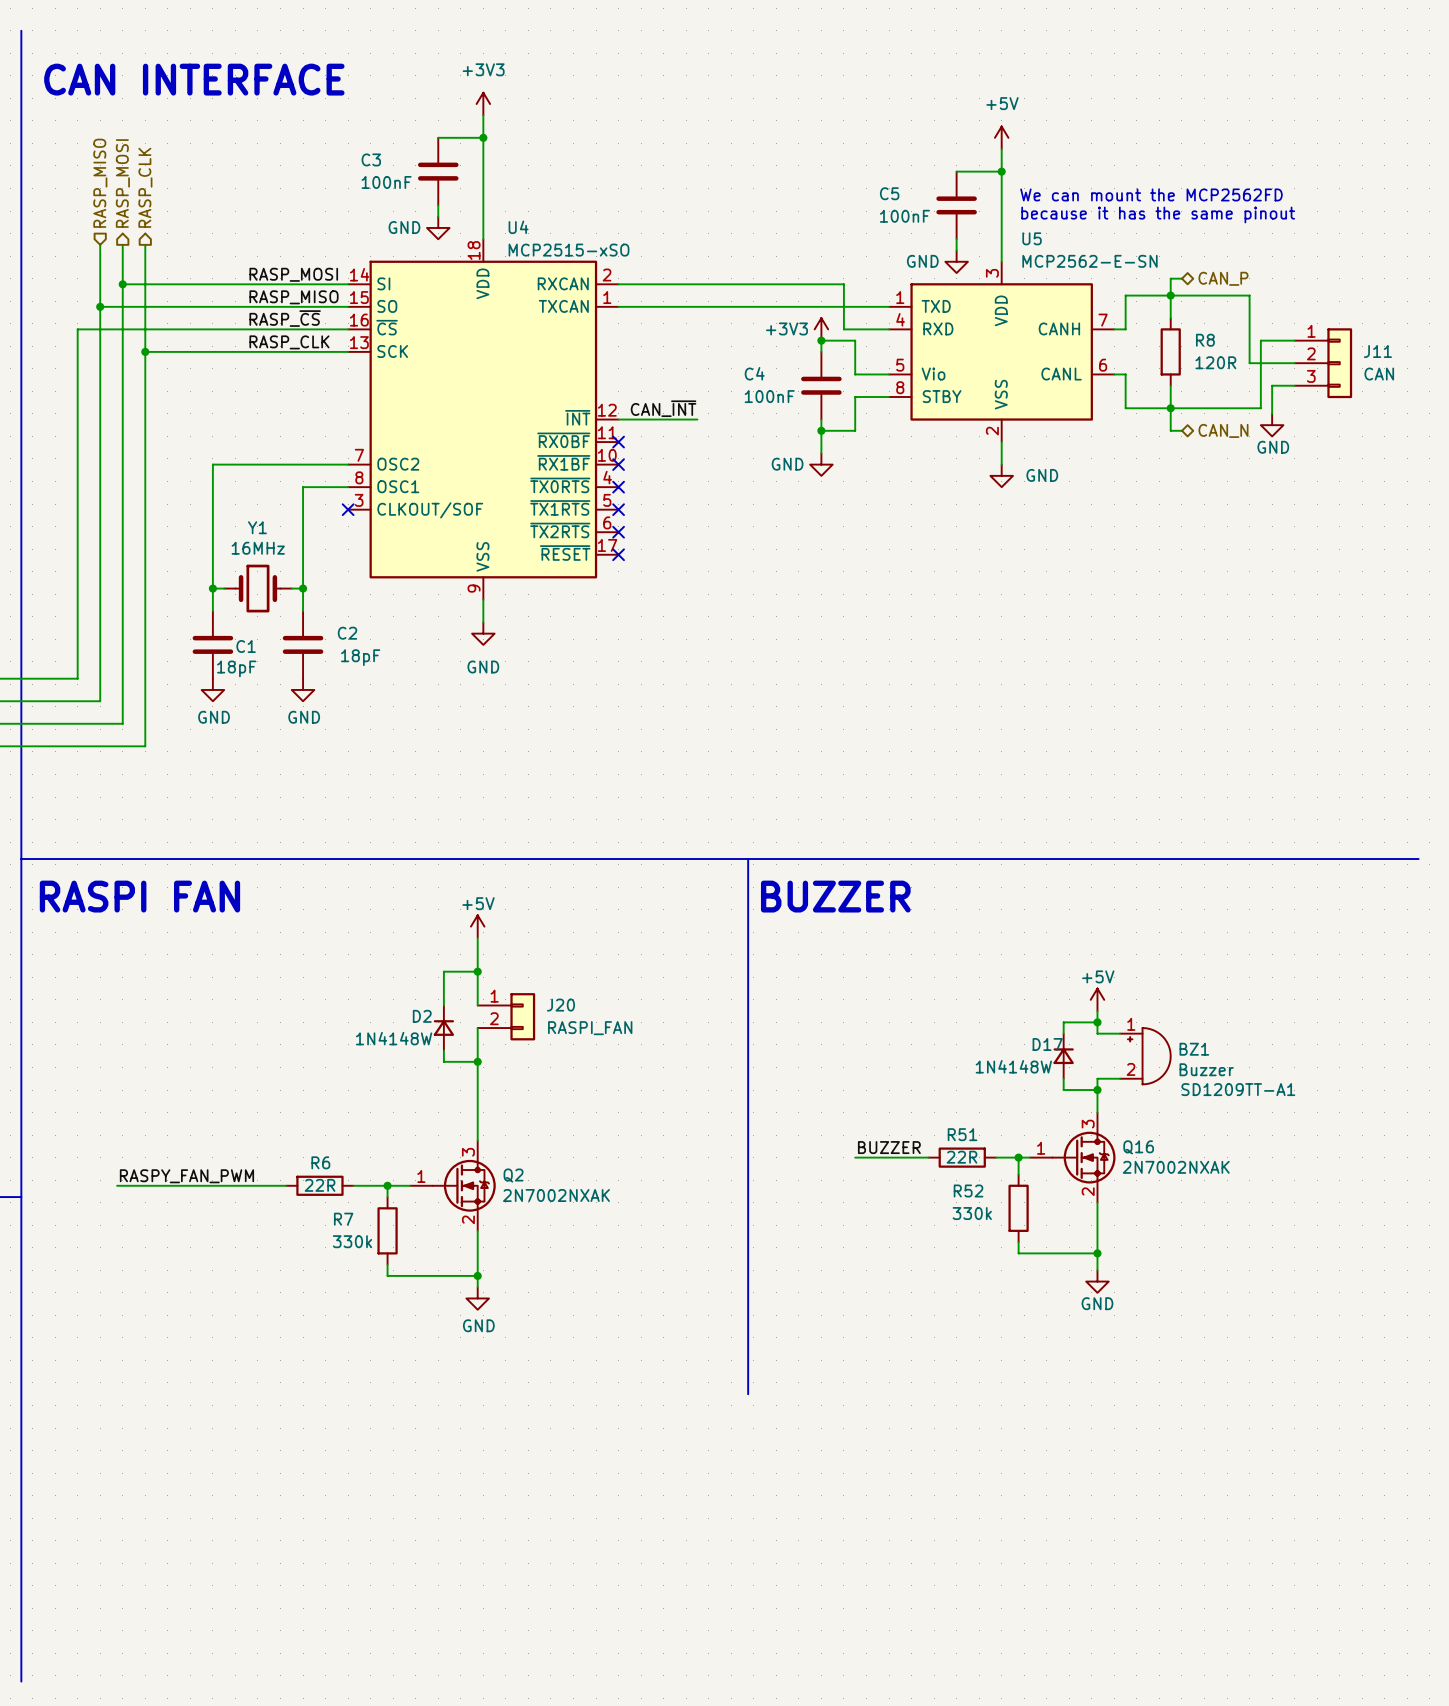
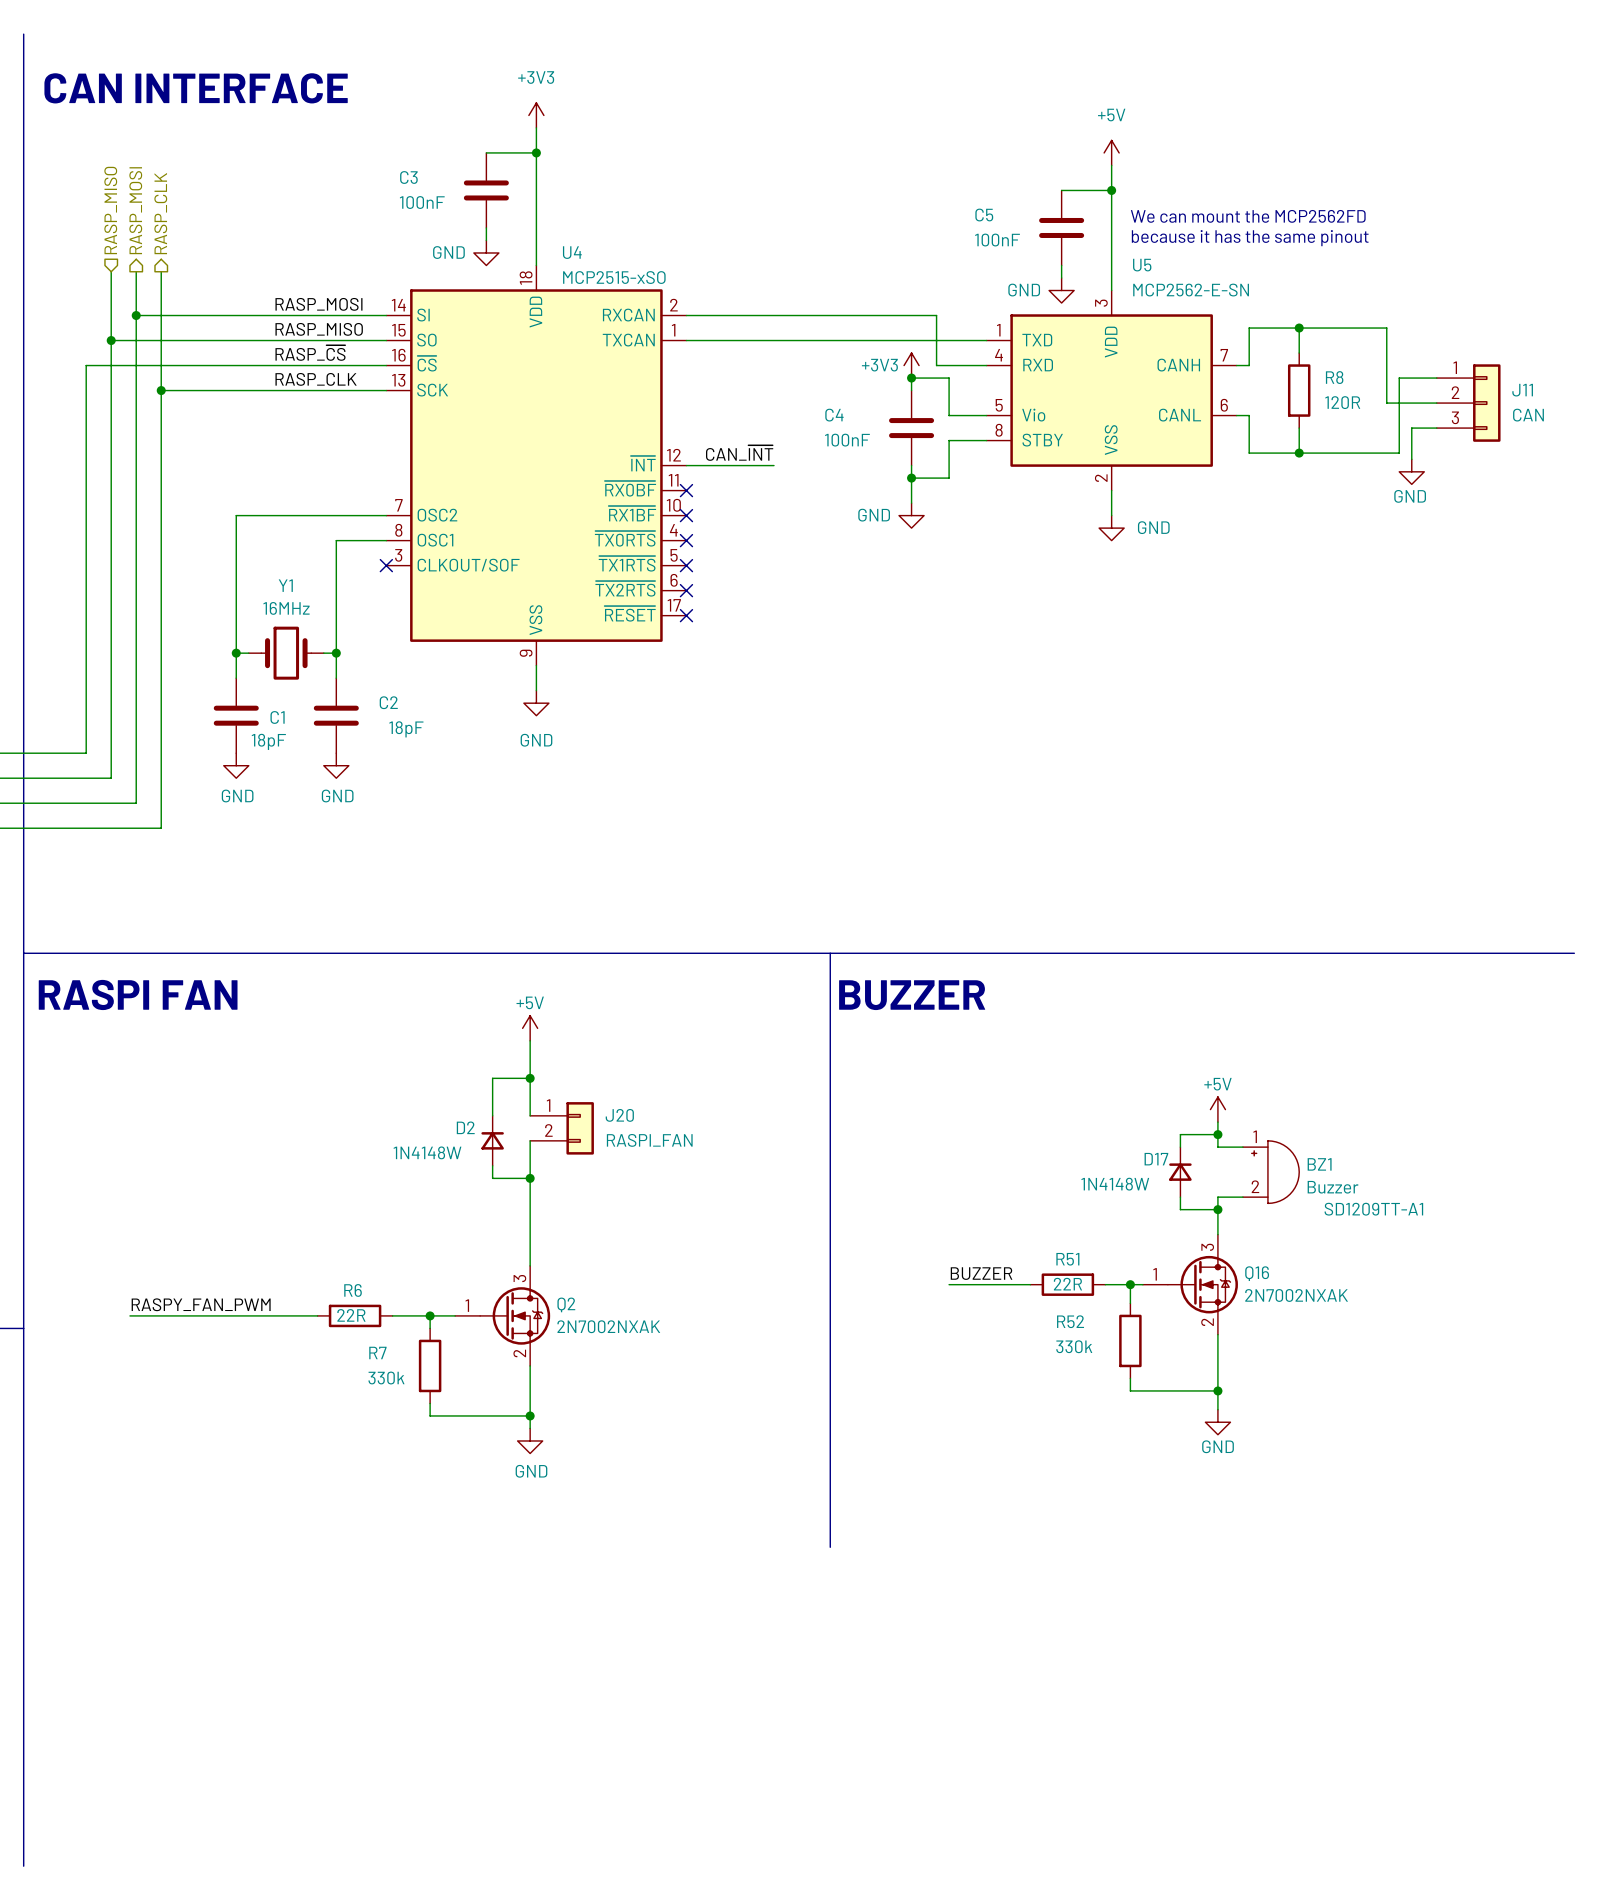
wire: (1181, 278) (1170, 278) (1170, 295) -> none
hierarchical label: CAN_P (1223, 278) -> none
wire: (1170, 408) (1170, 430) (1181, 430) -> none
hierarchical label: CAN_N (1223, 430) -> none

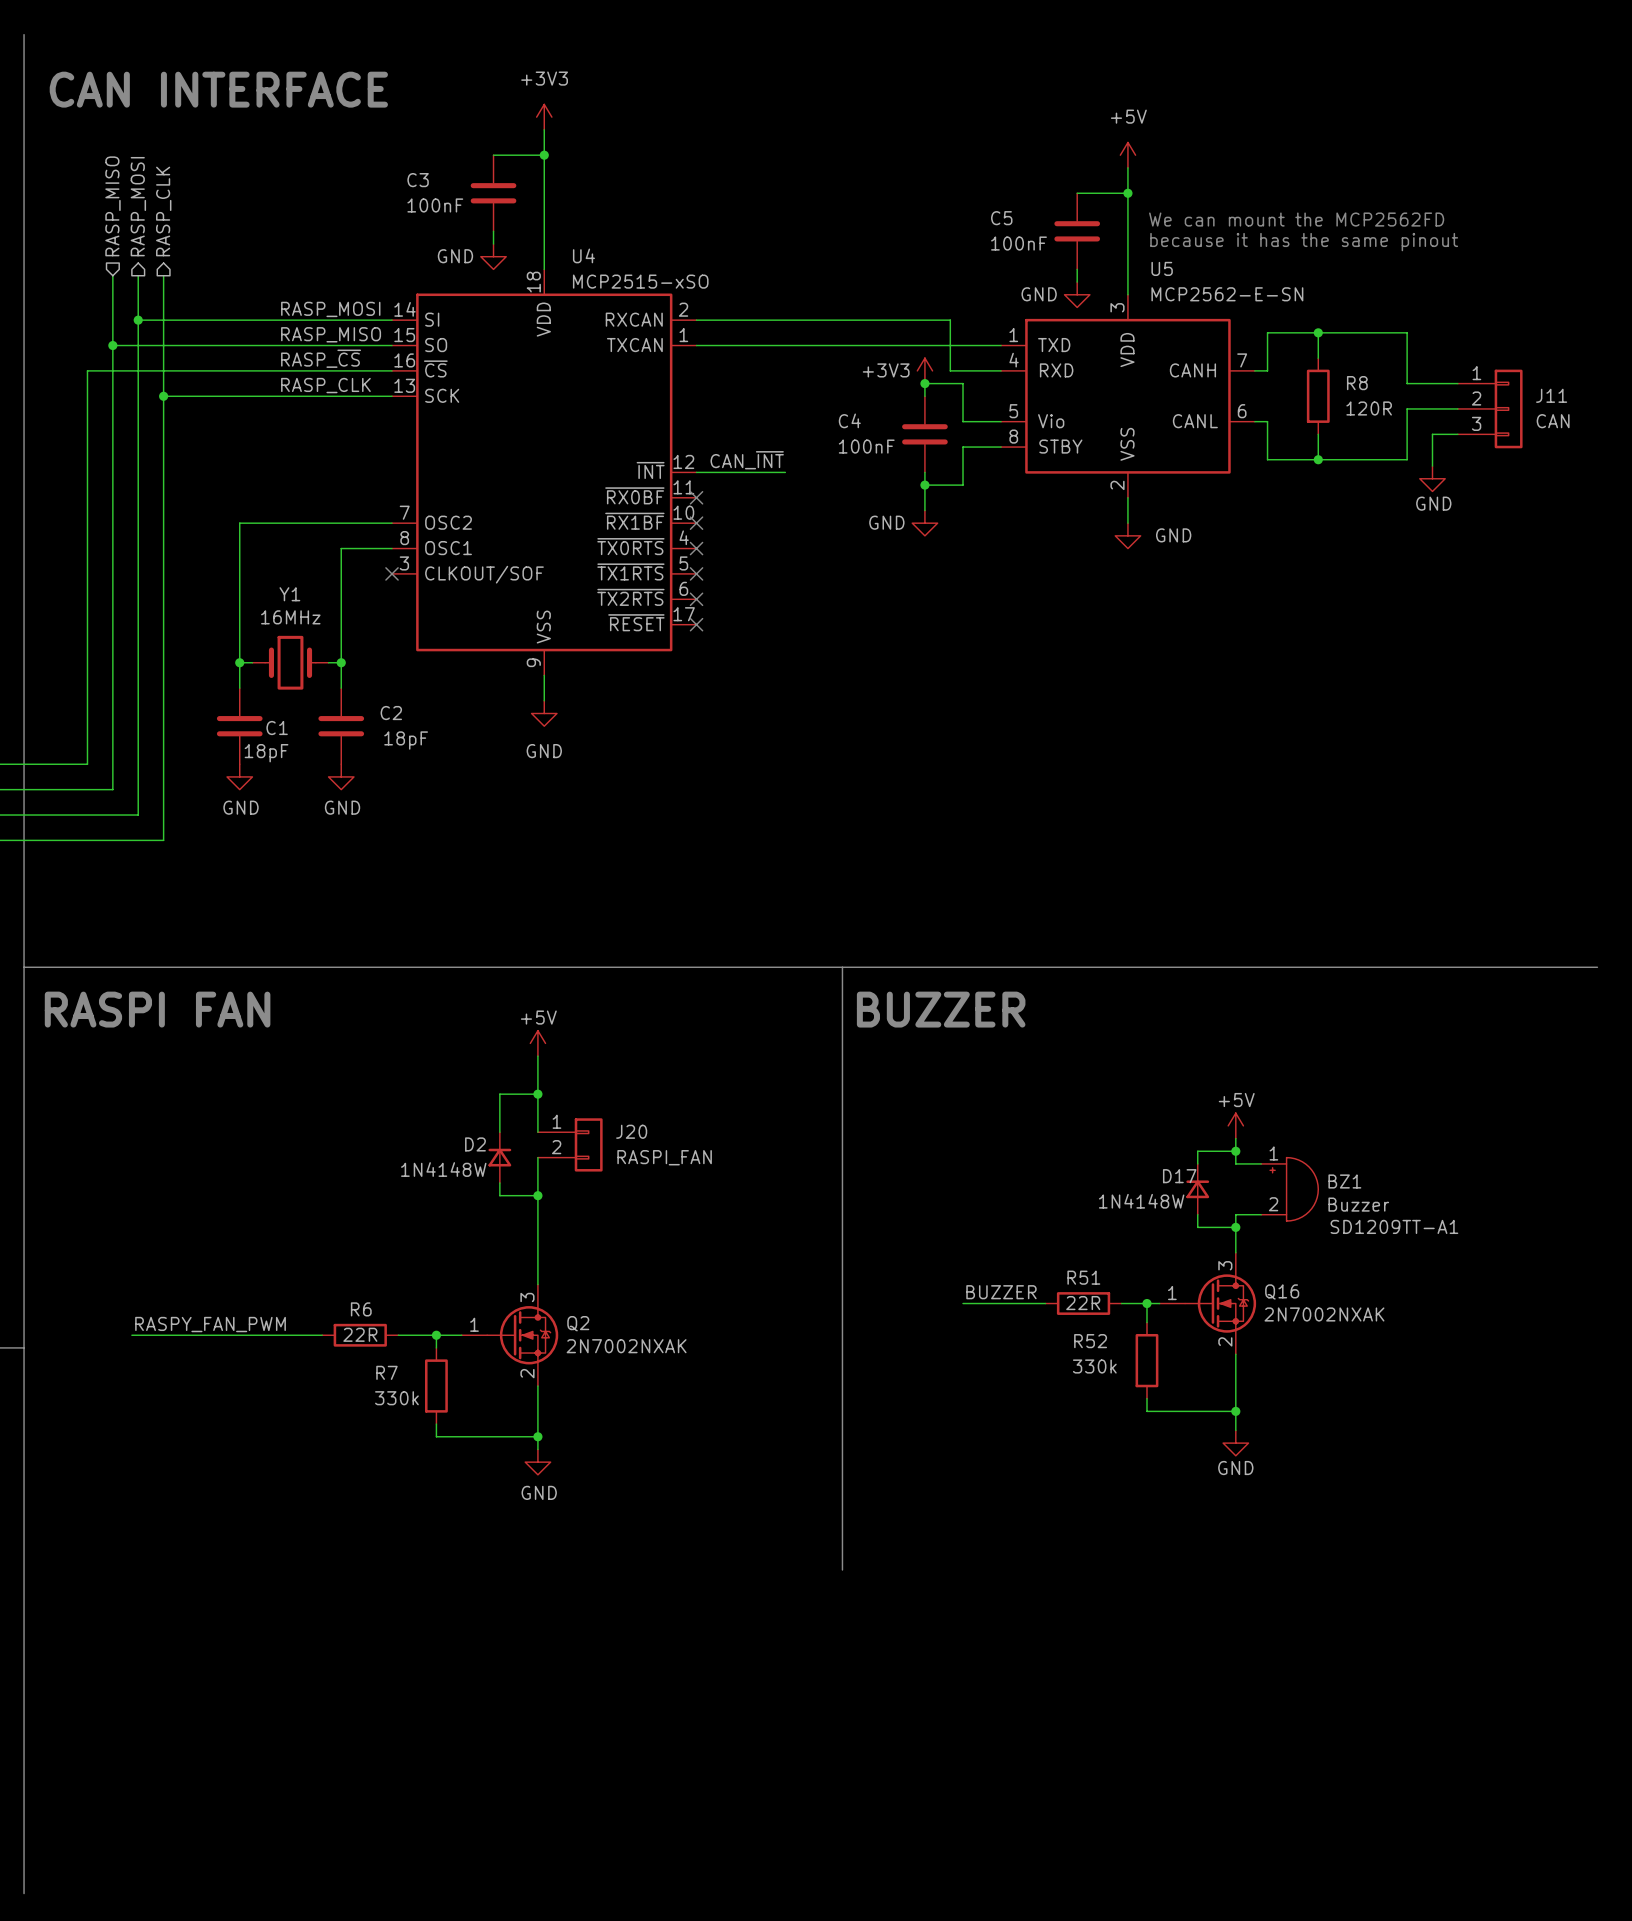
wire: (1386, 378) (1386, 403) -> (1407, 383) (1419, 383)
wire: (1399, 378) (1399, 453) (1386, 453) -> (1407, 408) (1407, 459)

